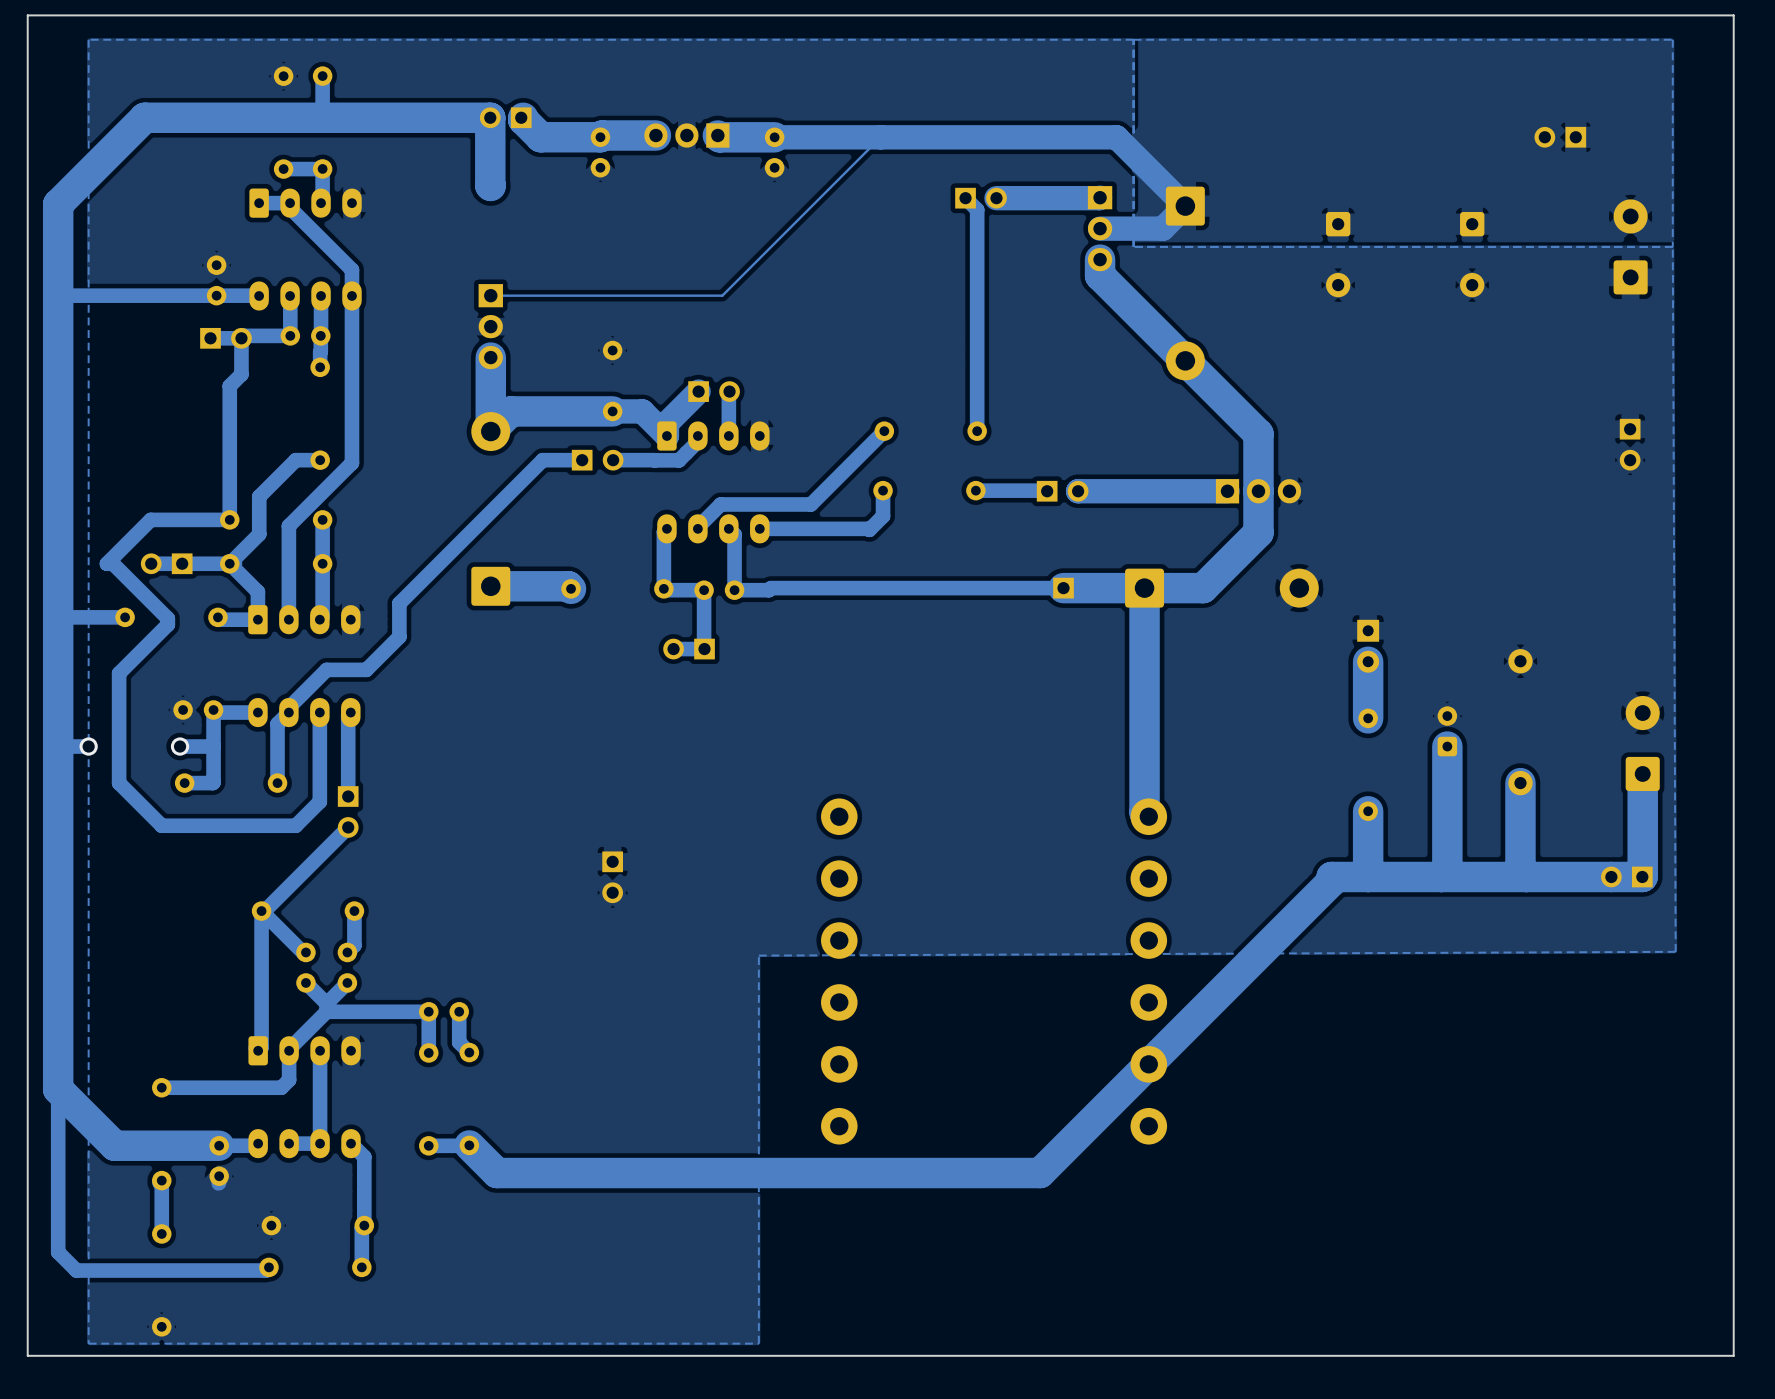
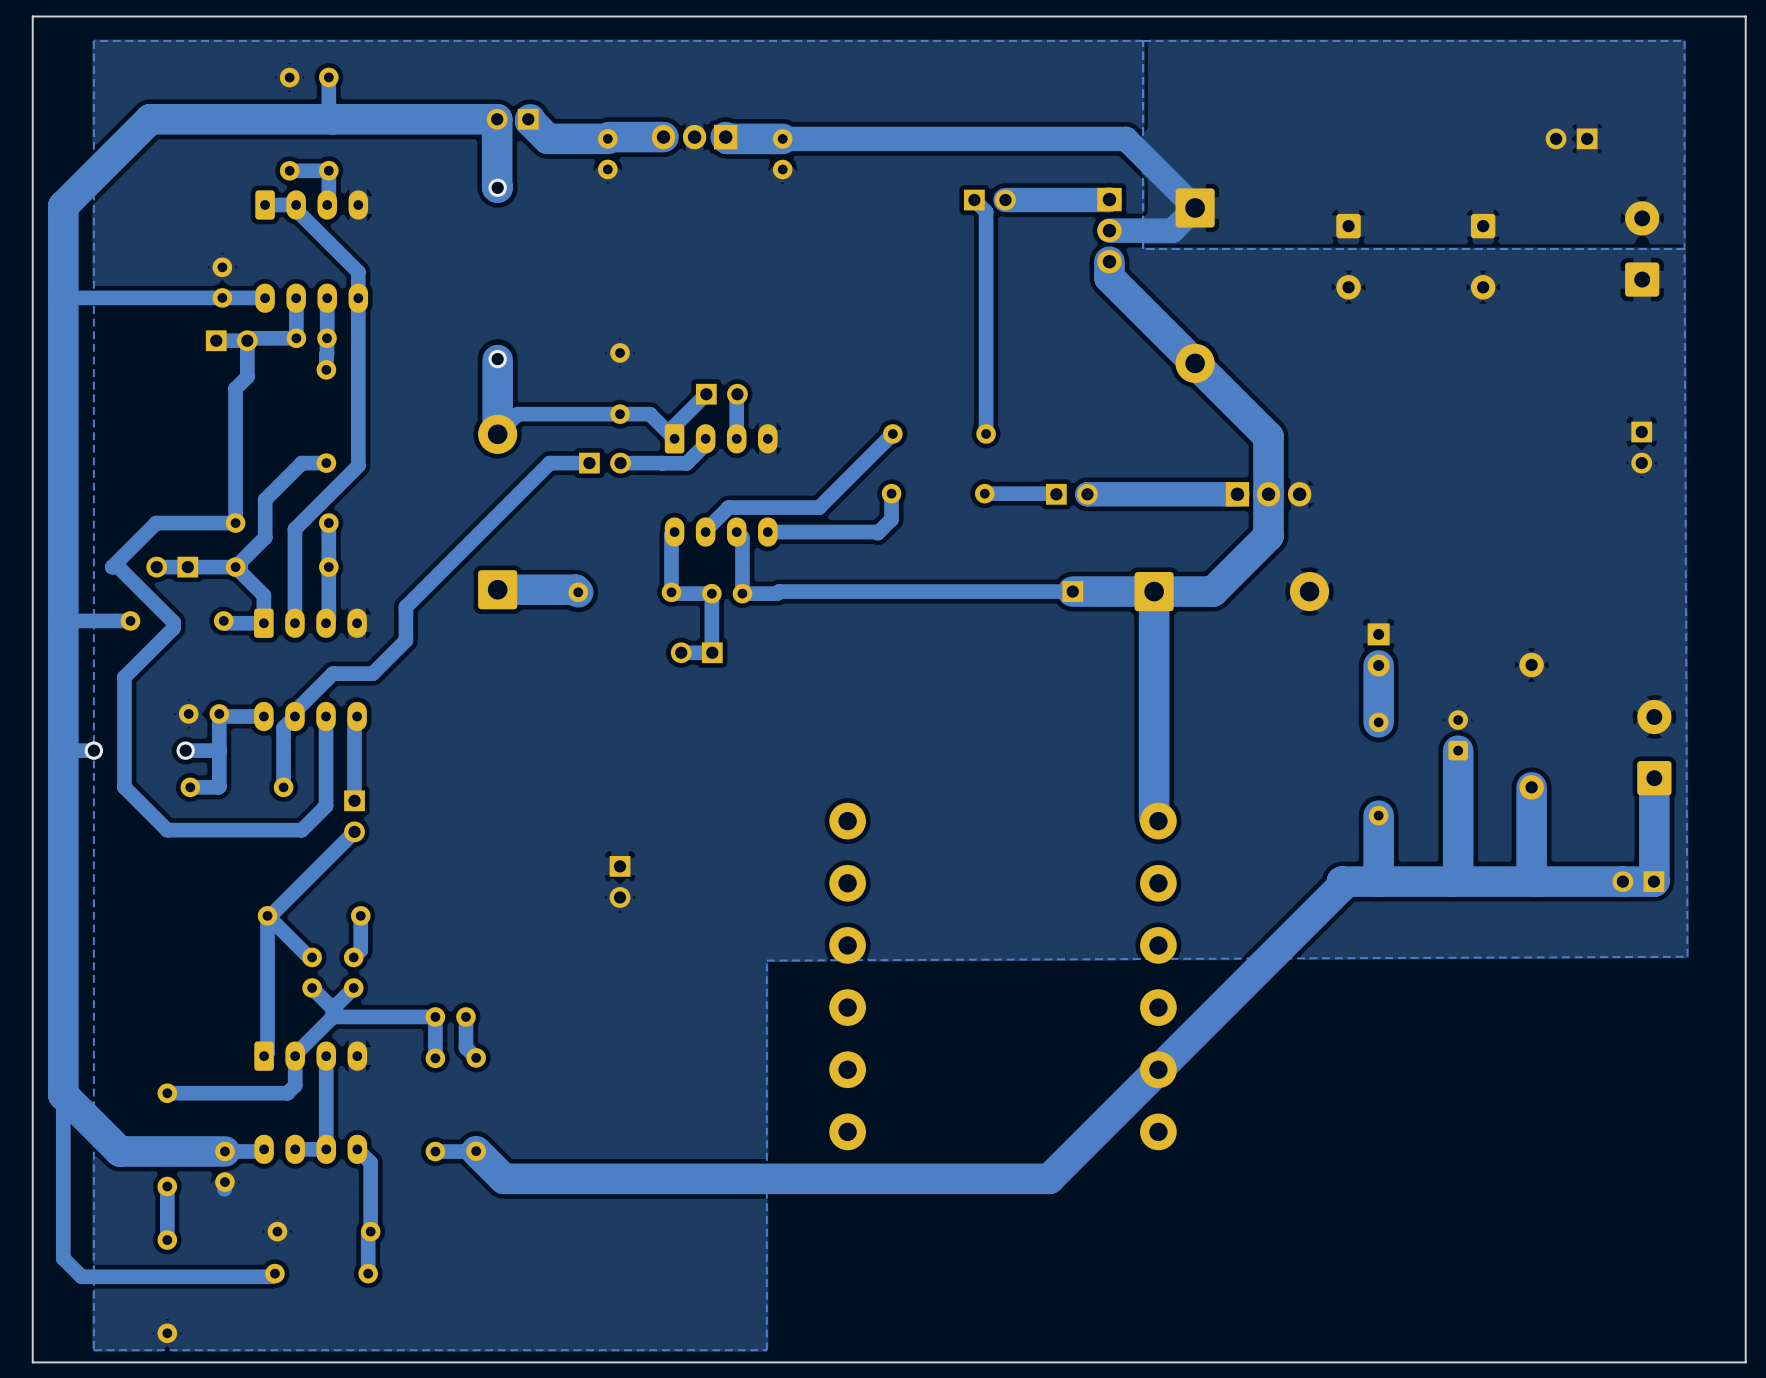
track: (880, 137) (722, 295) (490, 295) -> none
via: none -> (497, 187)
part: (490, 326) -> none
via: none -> (497, 359)
track width: thick (698, 391) (666, 423) (666, 435) (642, 411) (510, 411) (490, 431) -> thin (706, 394) (674, 426) (674, 438) (649, 414) (517, 414) (497, 434)

